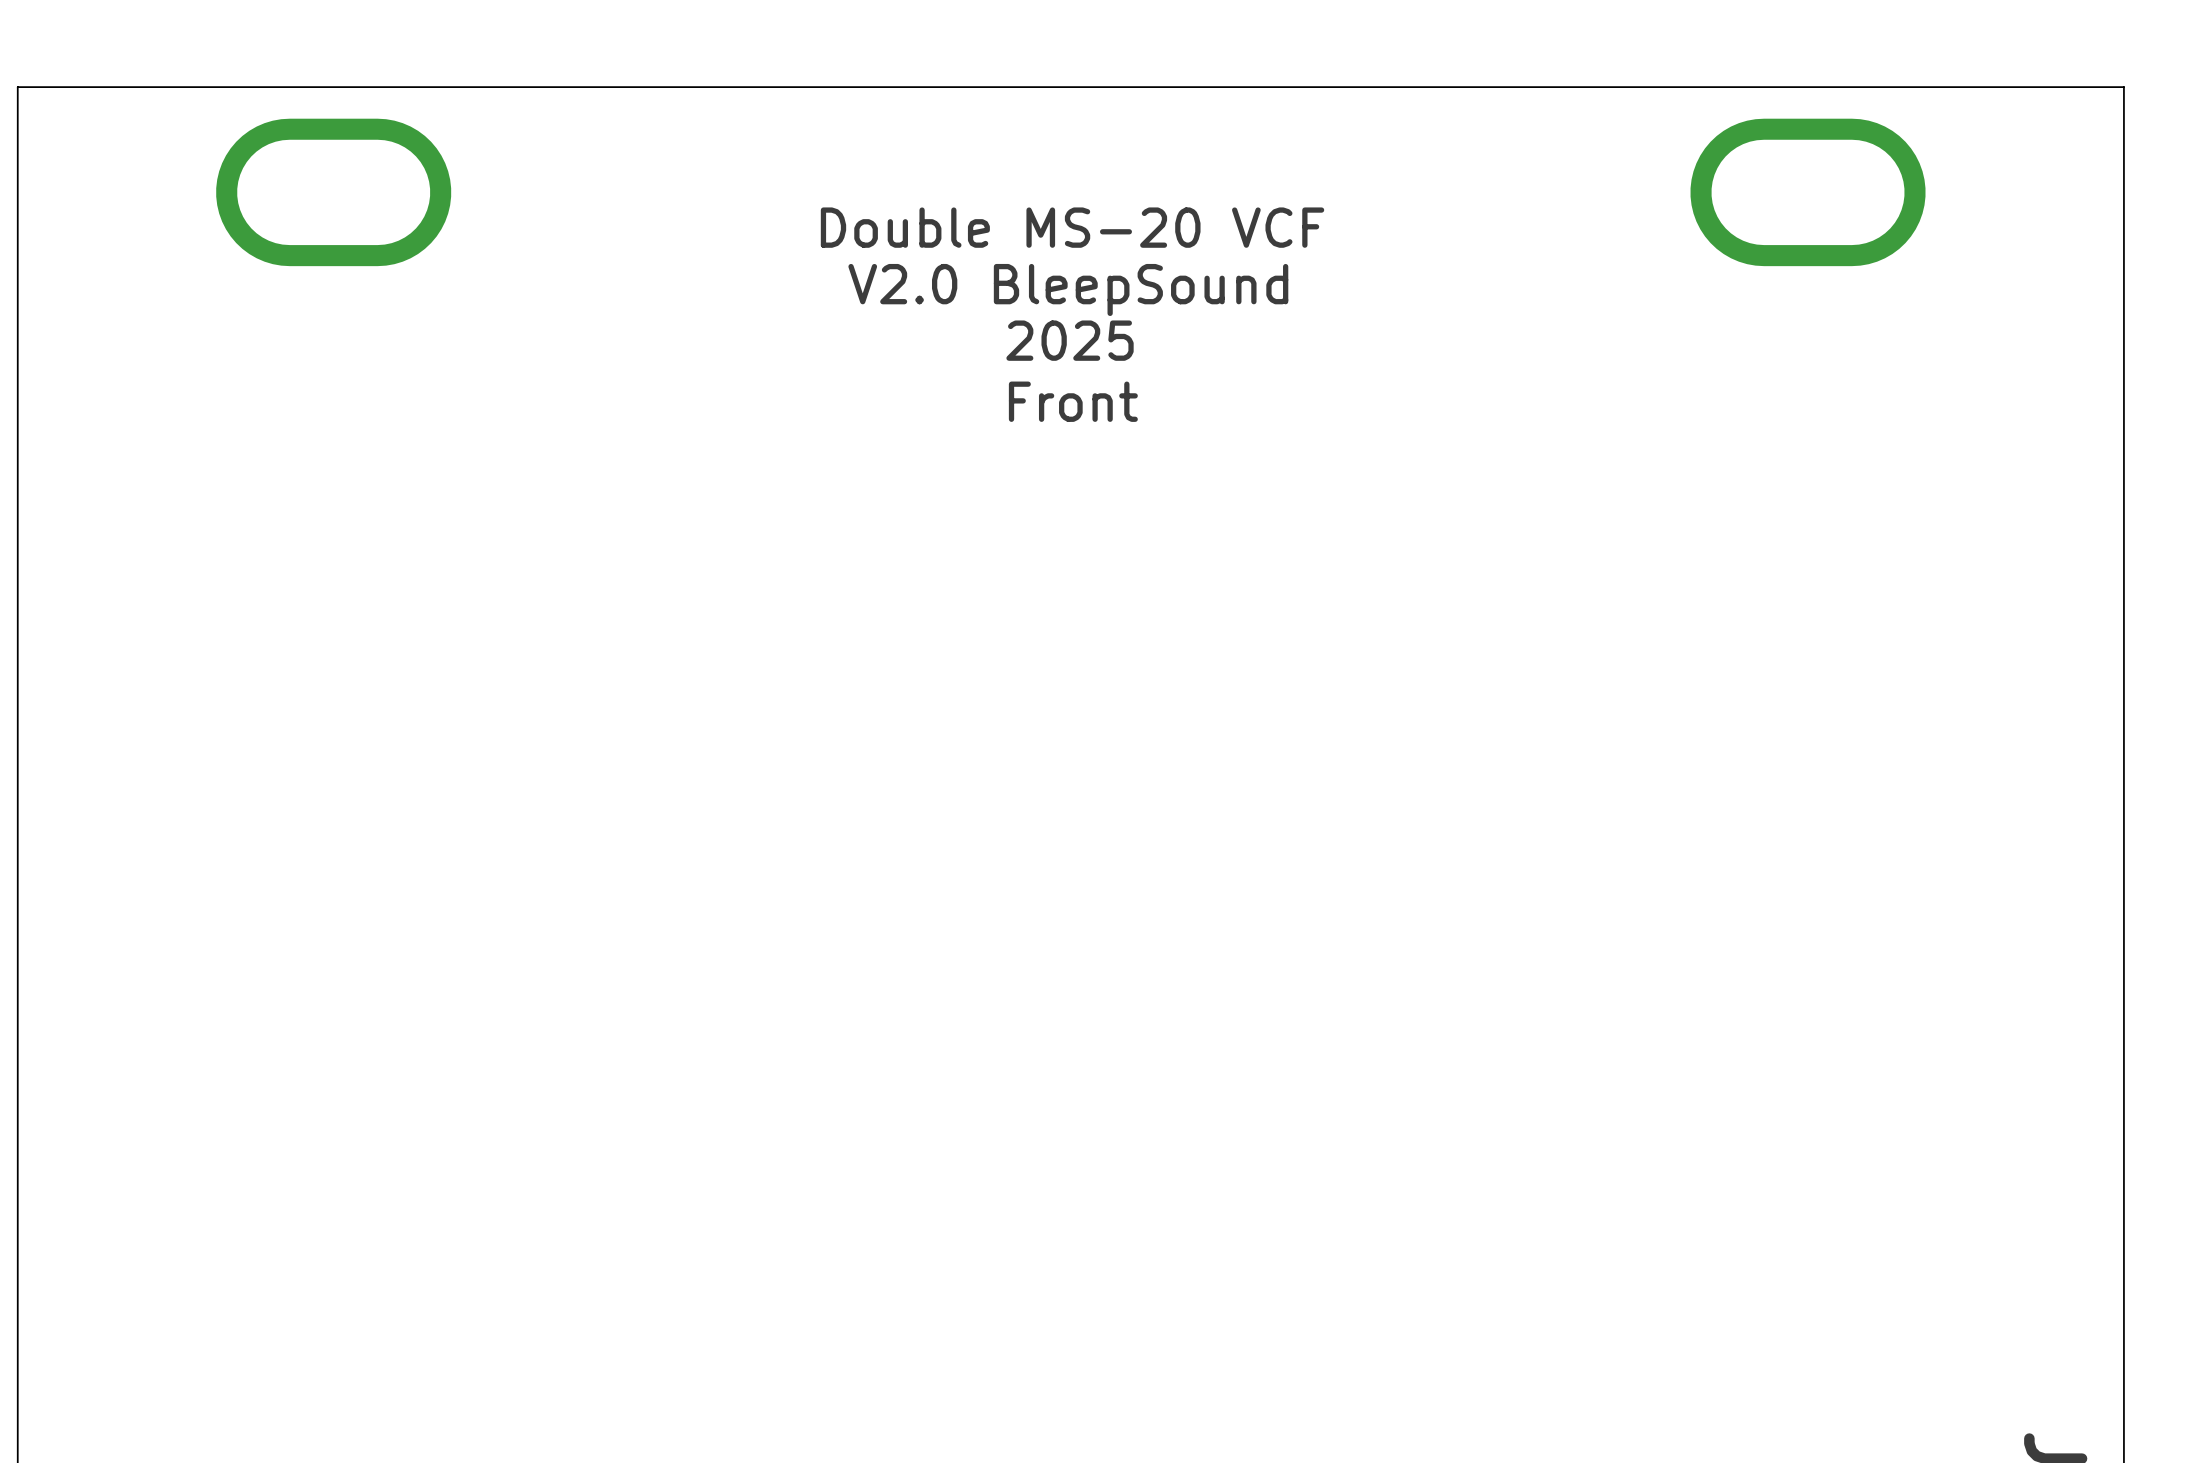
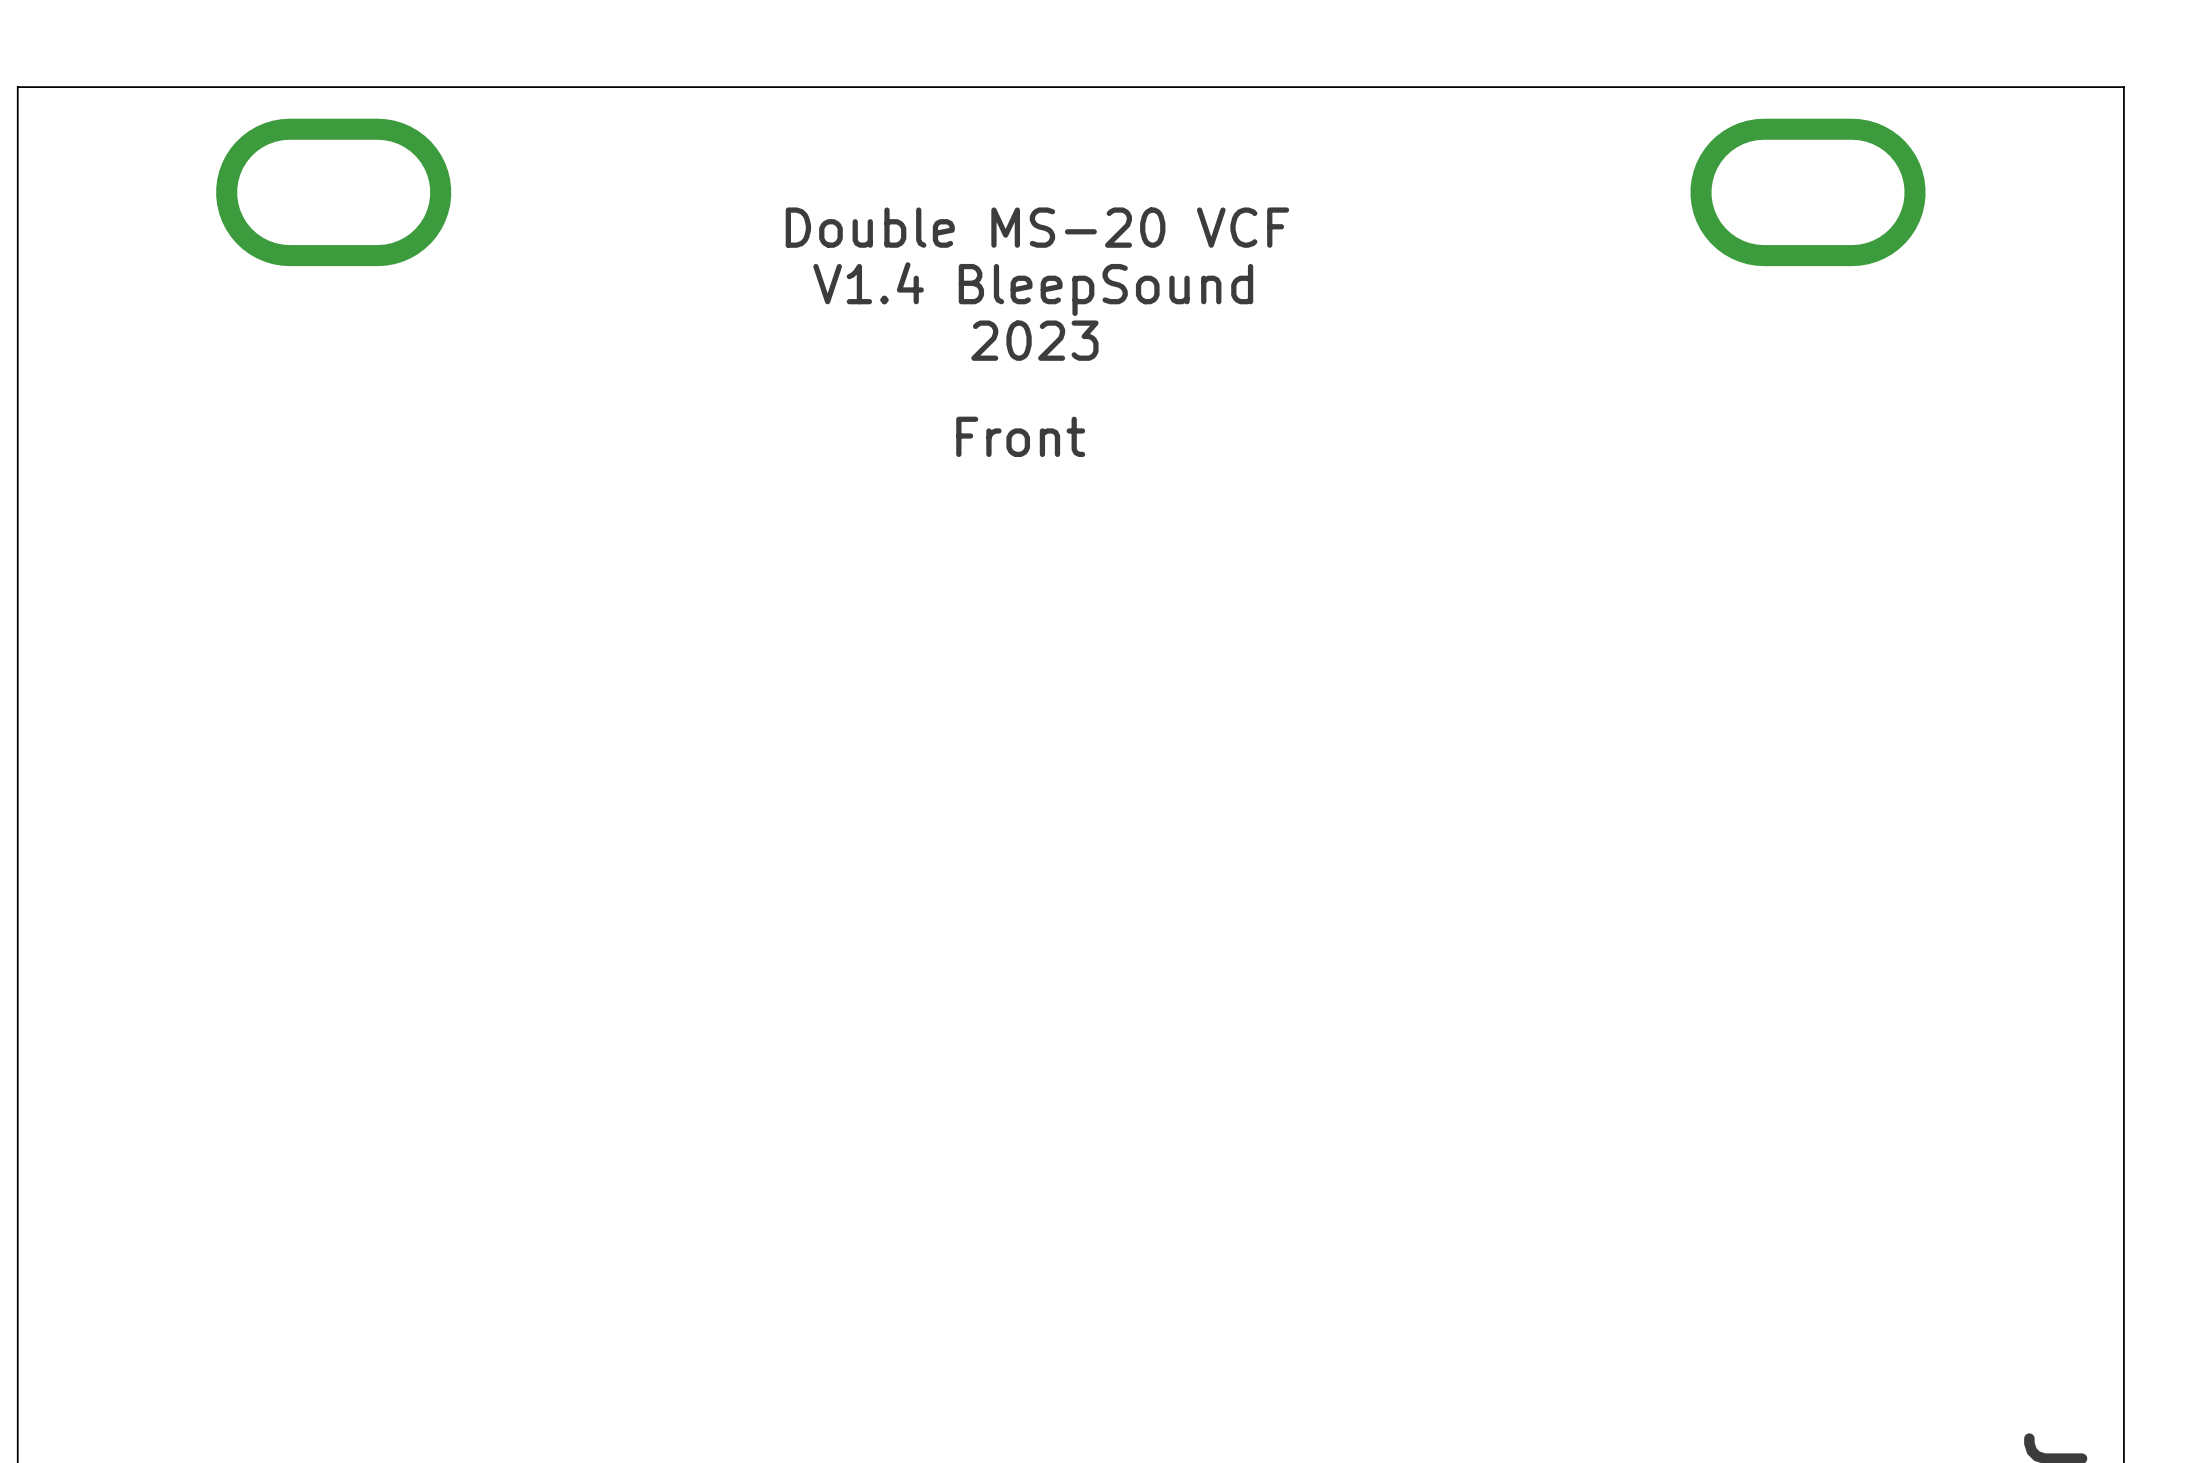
text position: Double MS-20 VCF (1072, 227) -> Double MS-20 VCF (1037, 227)
text: V2.0 BleepSound (1068, 289) -> V1.4 BleepSound (1033, 289)
text: 2025 (1070, 340) -> 2023 (1034, 340)
text position: Front (1073, 401) -> Front (1020, 436)

